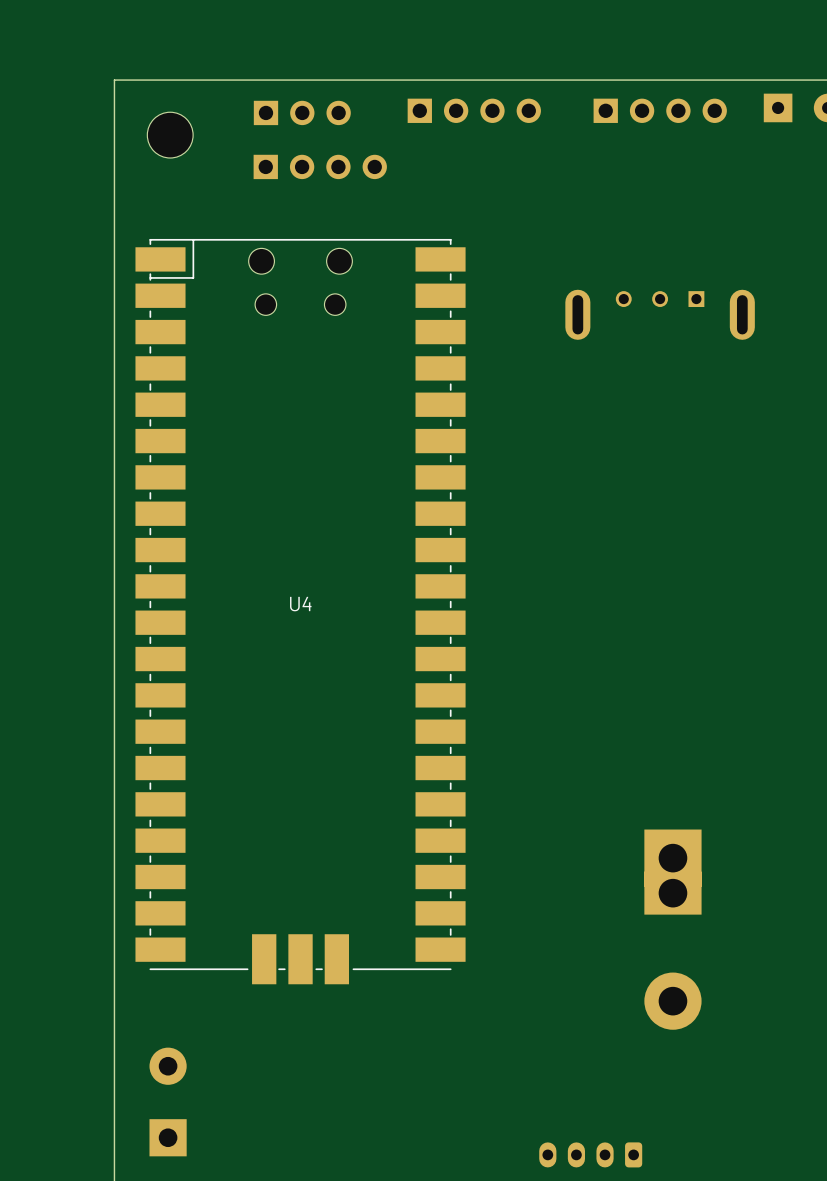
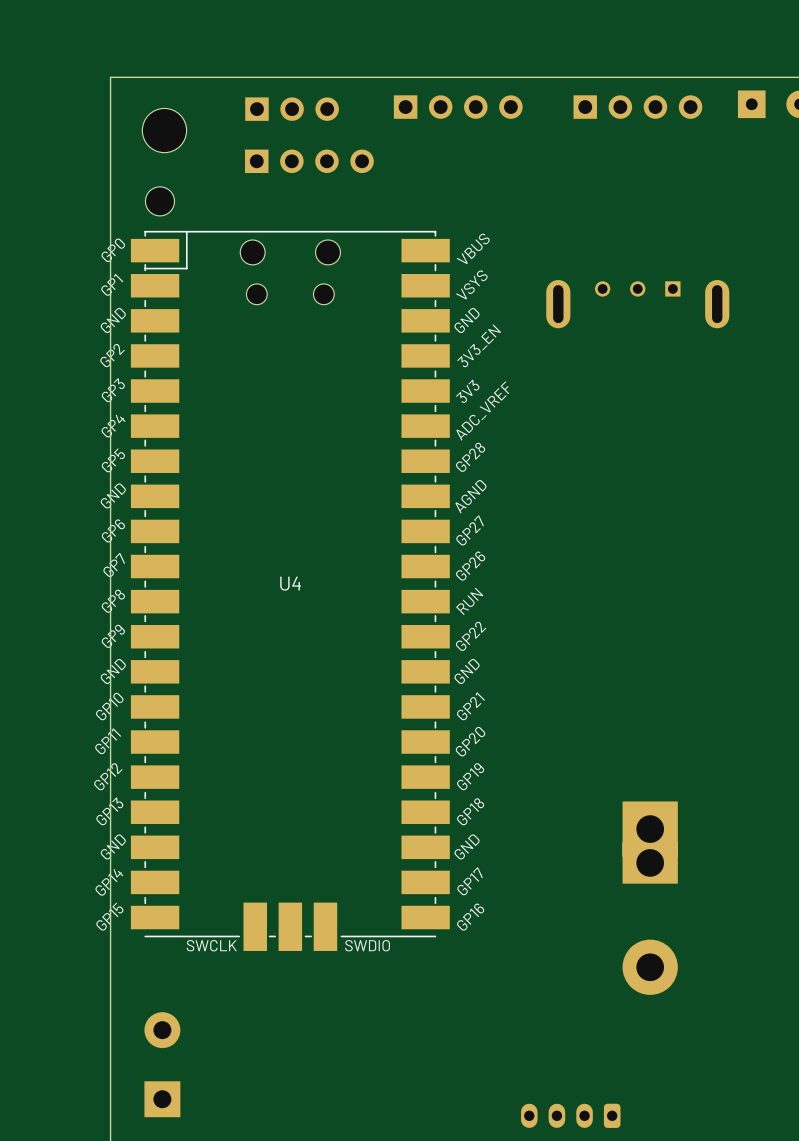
part: none -> (159, 201)
U4 footprint: [135, 238, 466, 985] -> [130, 230, 450, 951]

